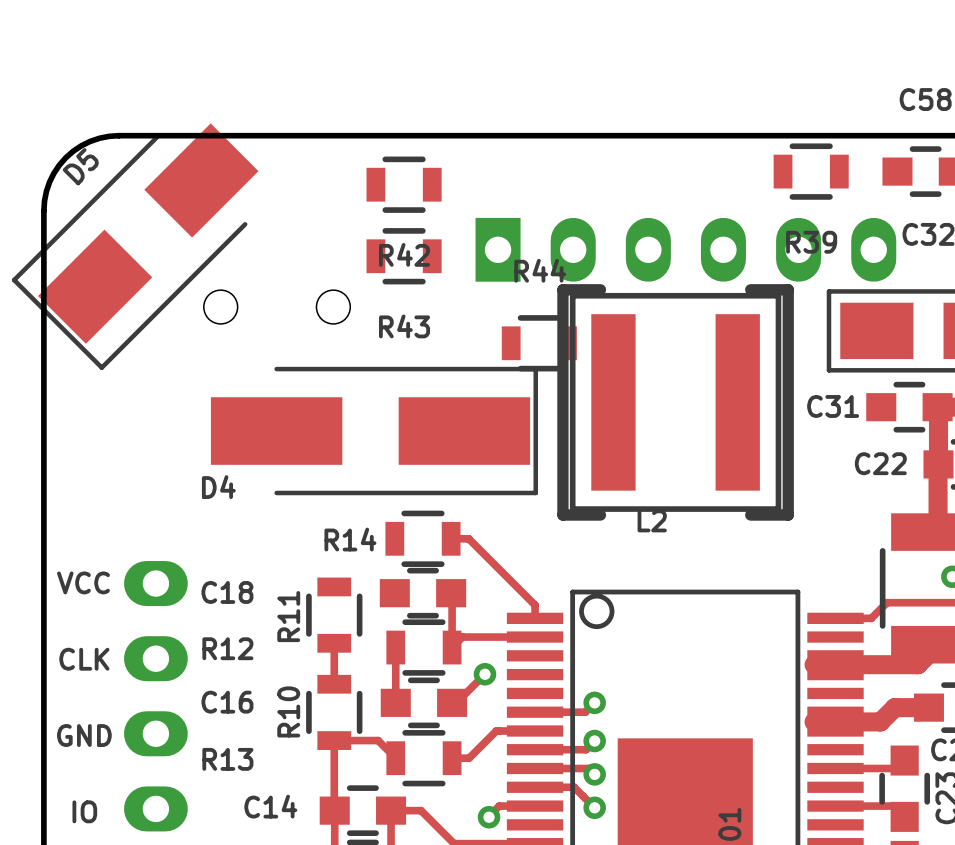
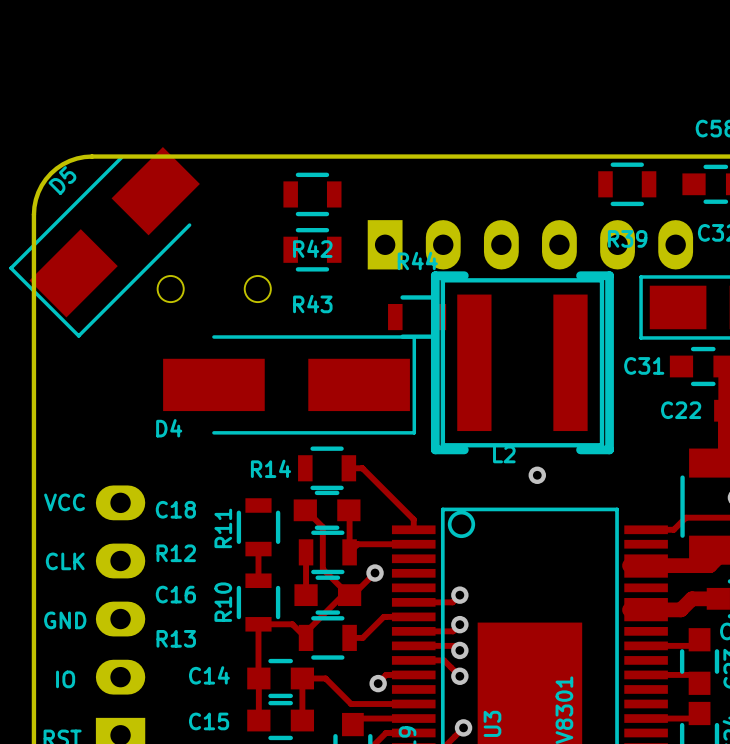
via: none -> (537, 475)
track: none -> (305, 510) (322, 527) (322, 569) (348, 595)
track: none -> (349, 595) (343, 595) (306, 632)

